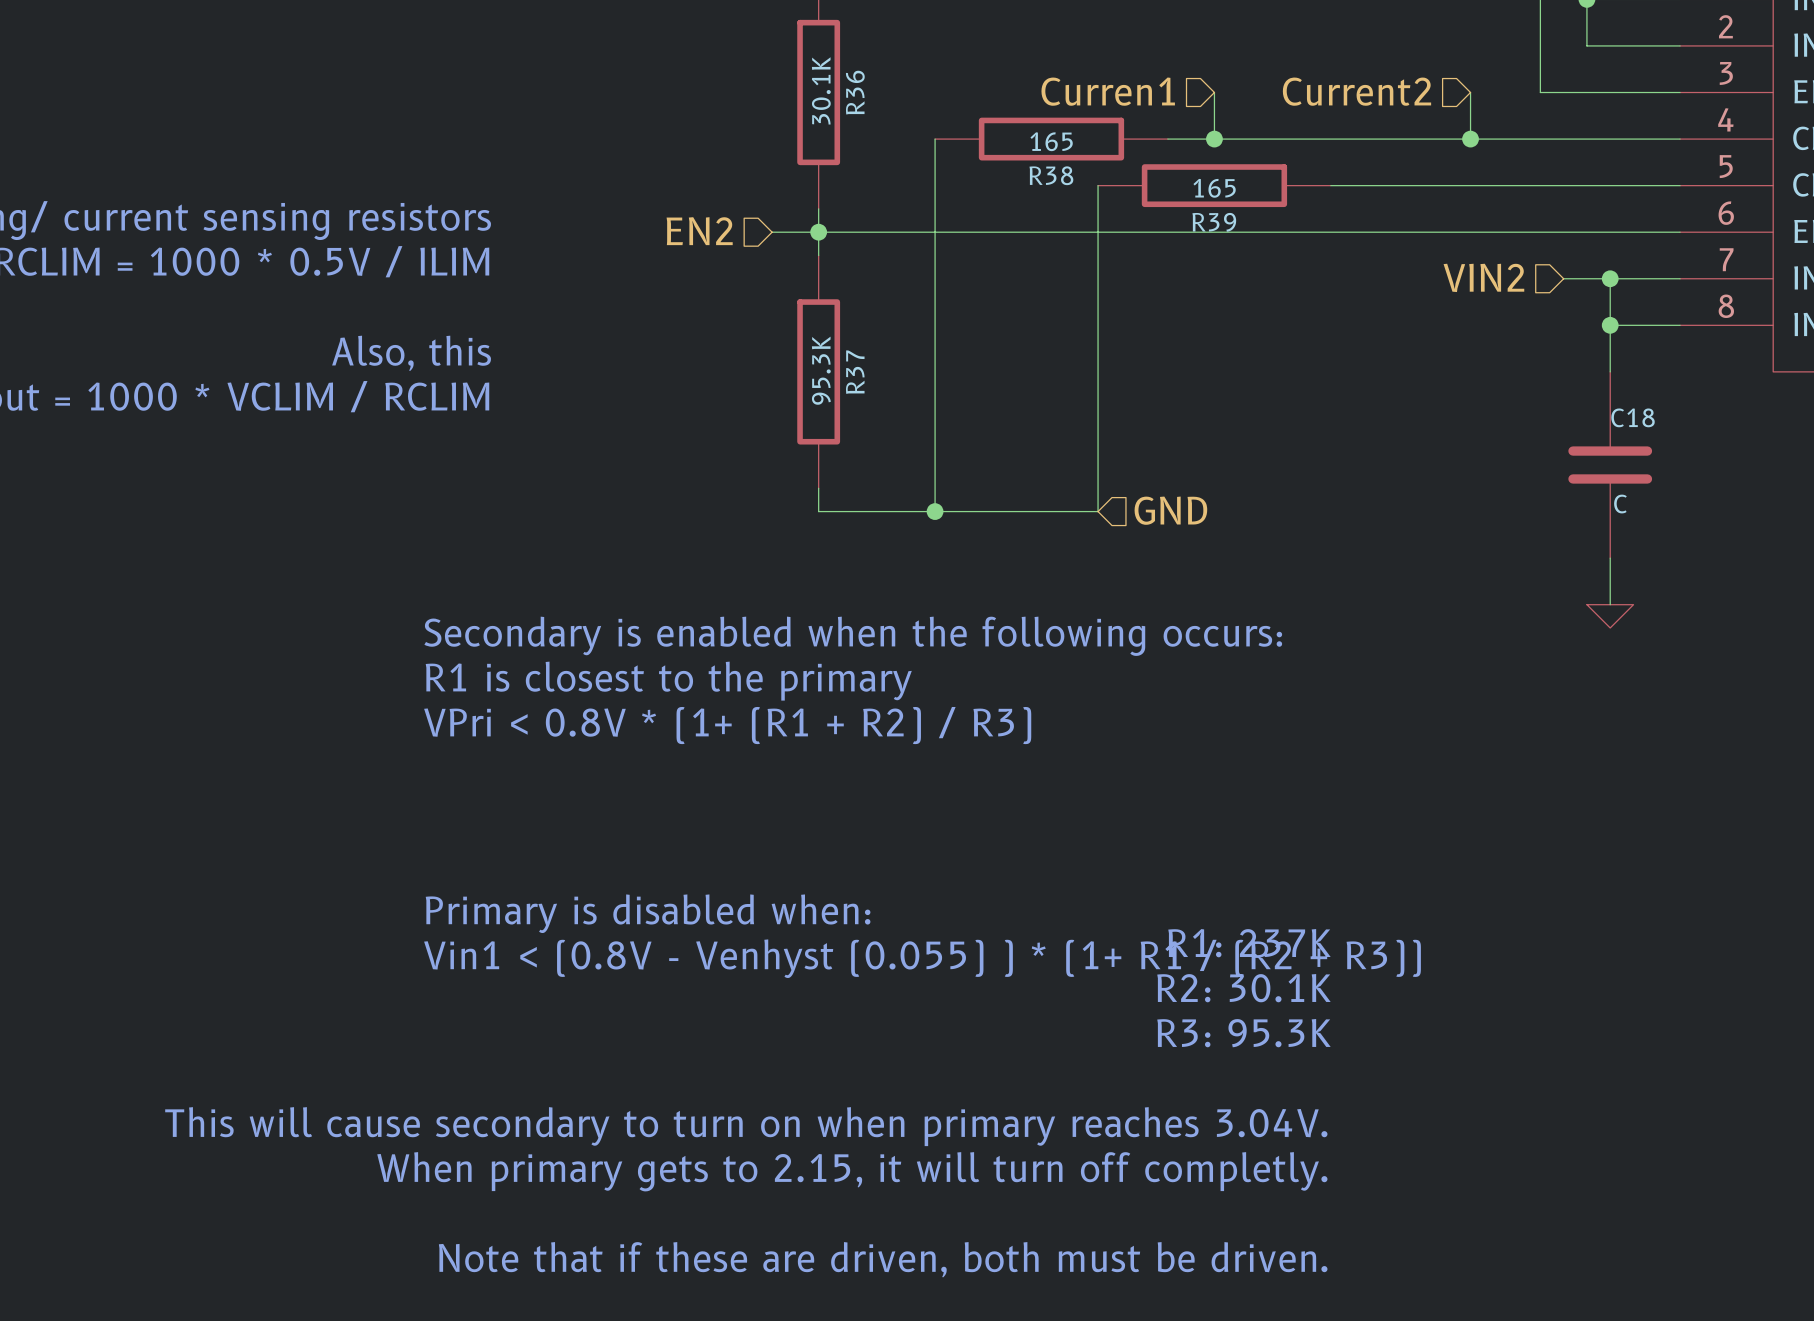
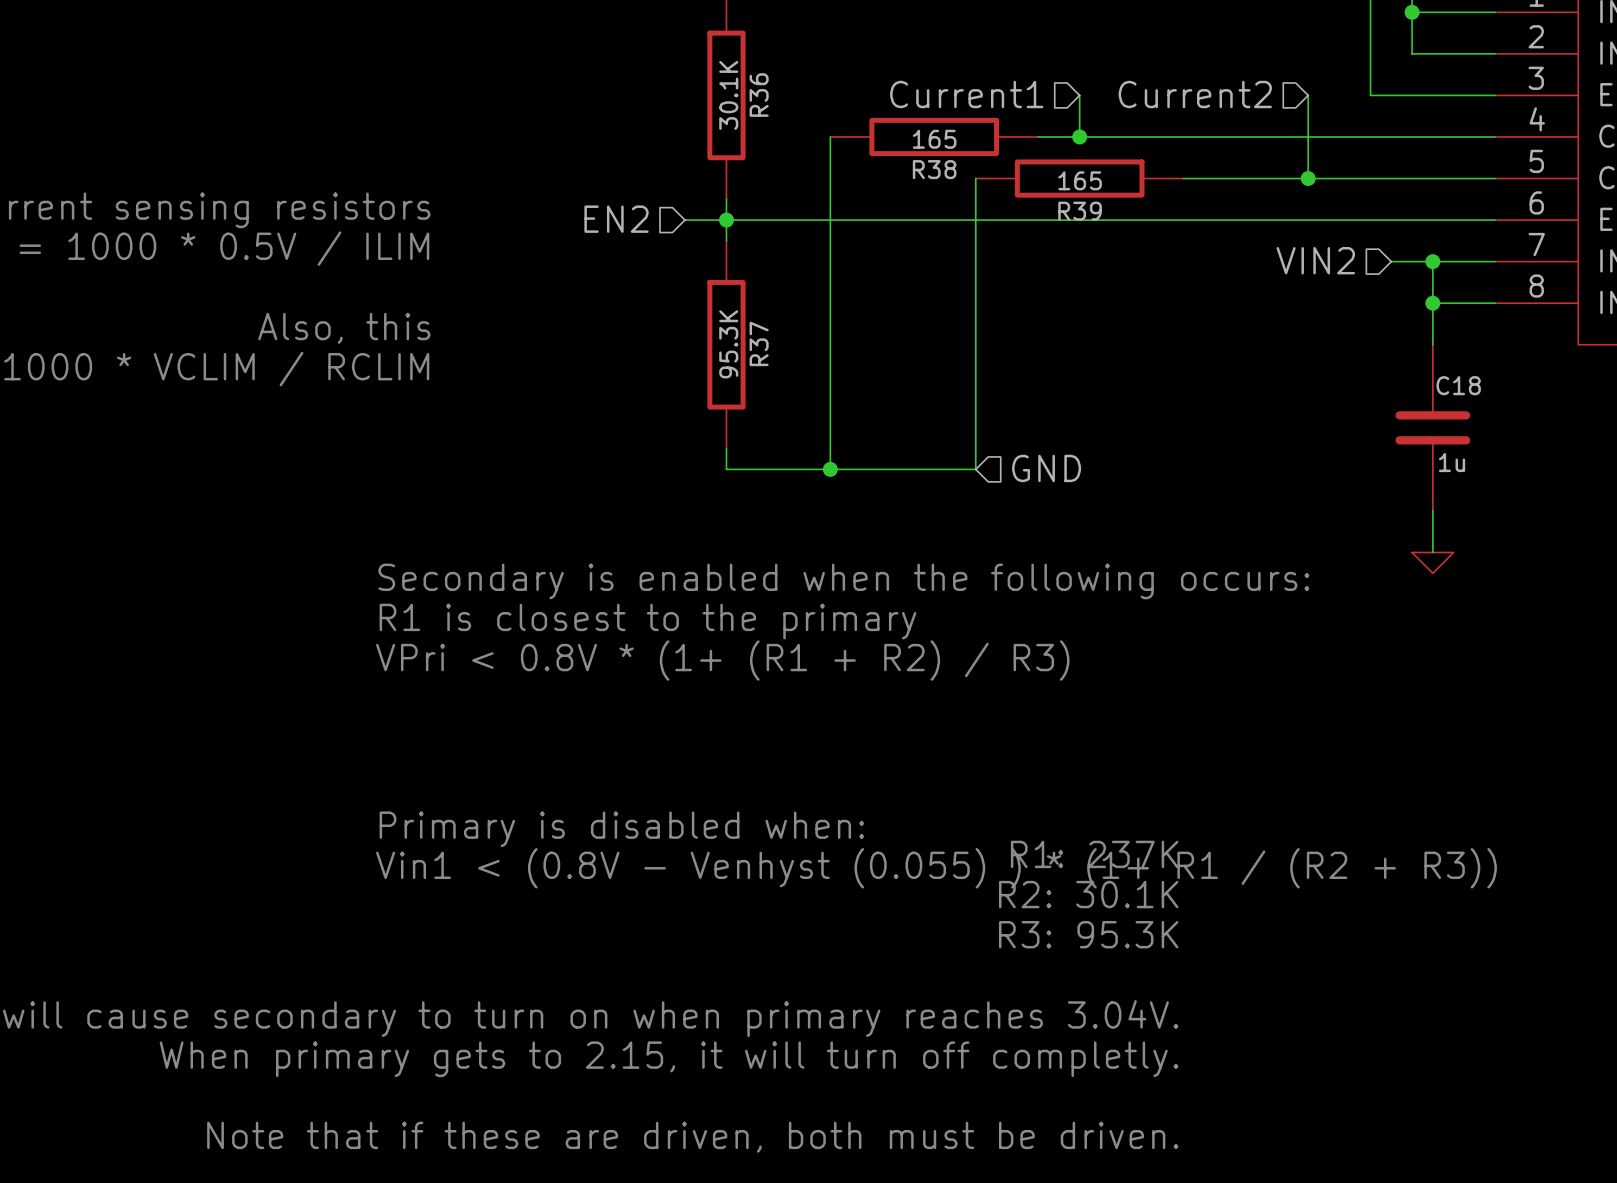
hierarchical label: Curren1 (1108, 91) -> Current1 (966, 94)
wire: none -> (1308, 136) (1308, 178)
junction position: (1470, 139) -> (1308, 178)
C18 value: C (1620, 504) -> 1u (1452, 462)

